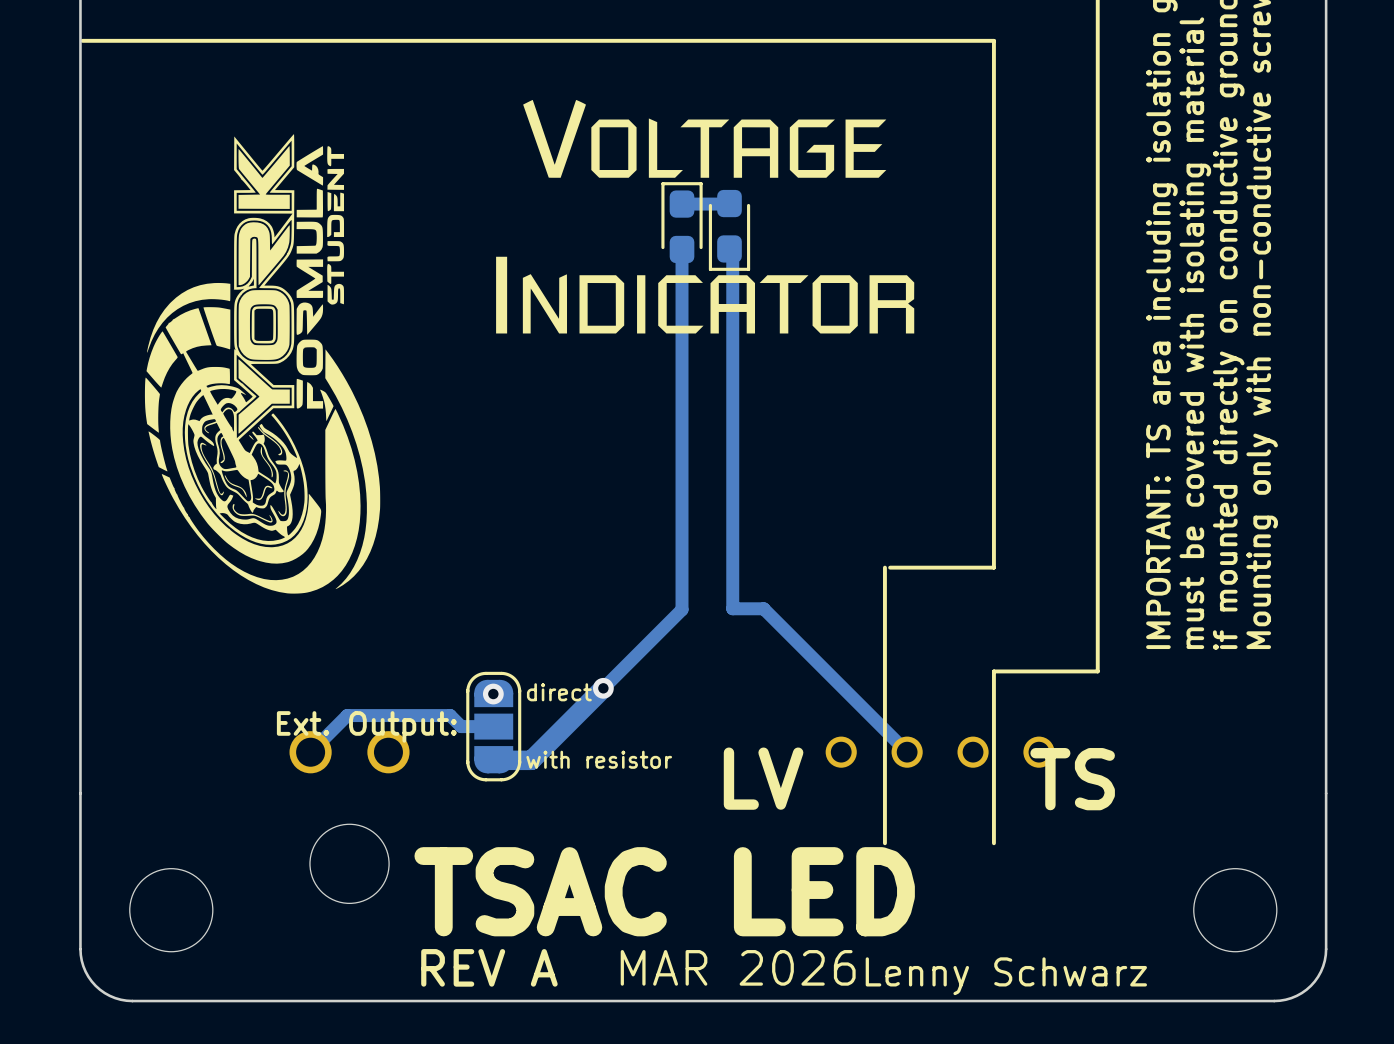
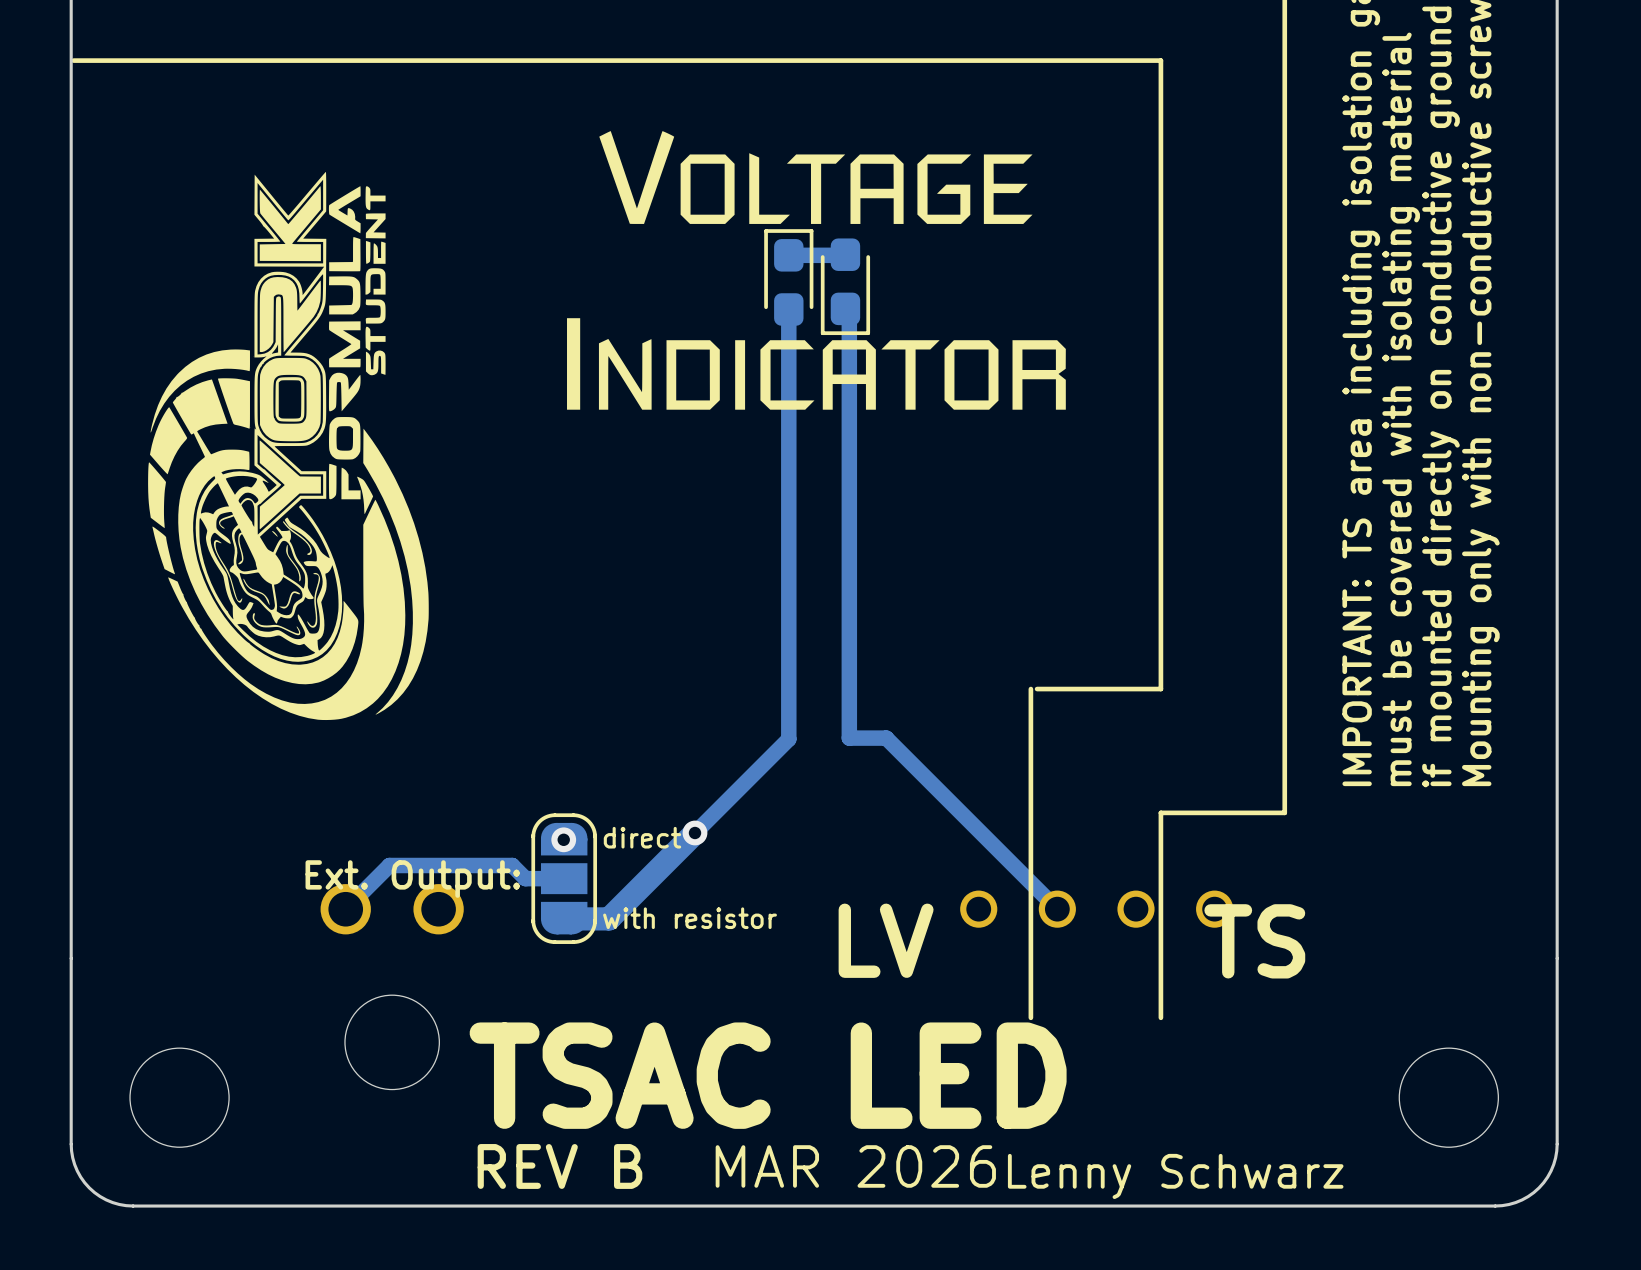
text: REV A (489, 967) -> REV B (559, 1166)

